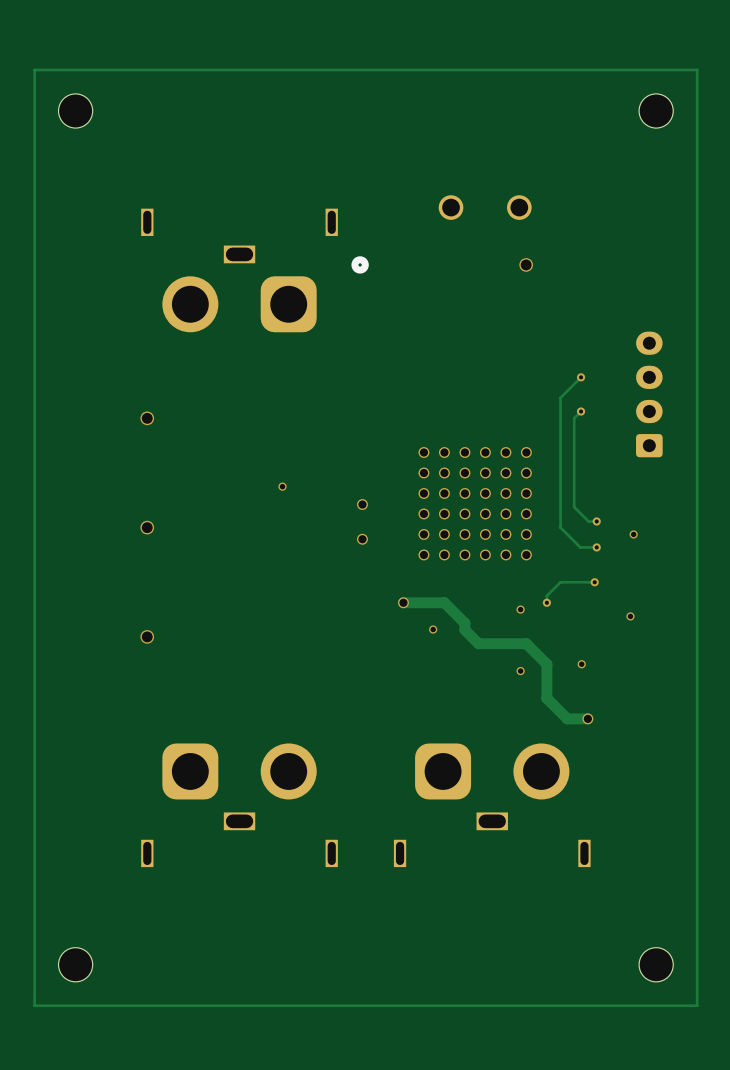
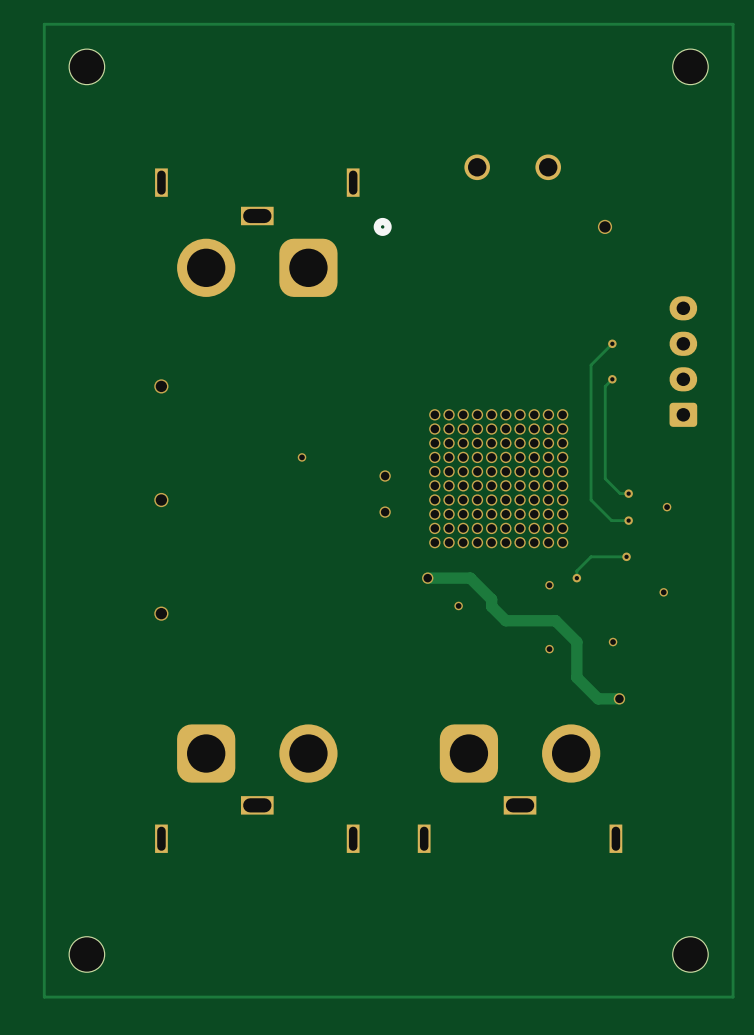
via position: (526, 264) -> (605, 226)
via: none -> (434, 414)
via: none -> (449, 414)
via: none -> (463, 414)
via: none -> (477, 414)
via: none -> (491, 414)
via: none -> (505, 414)
via: none -> (520, 414)
via: none -> (534, 414)
via: none -> (548, 414)
via: none -> (562, 414)
via: (423, 452) -> none
via: (444, 452) -> none
via: (464, 452) -> none
via: (485, 452) -> none
via: (505, 452) -> none
via: (526, 452) -> none
via: none -> (434, 429)
via: none -> (449, 429)
via: none -> (463, 429)
via: none -> (477, 429)
via: none -> (491, 429)
via: none -> (505, 429)
via: none -> (520, 429)
via: none -> (534, 429)
via: none -> (548, 429)
via: none -> (562, 429)
via: none -> (434, 443)
via: none -> (463, 443)
via: (444, 472) -> none
via: none -> (477, 443)
via: none -> (505, 443)
via: (485, 472) -> none
via: none -> (520, 443)
via: none -> (548, 443)
via: (526, 472) -> none
via: none -> (562, 443)
via: none -> (434, 457)
via: none -> (449, 457)
via: none -> (463, 457)
via: none -> (477, 457)
via: none -> (491, 457)
via: none -> (505, 457)
via: none -> (520, 457)
via: none -> (534, 457)
via: none -> (548, 457)
via: none -> (562, 457)
via: (423, 493) -> none
via: (444, 493) -> none
via: (464, 493) -> none
via: (485, 493) -> none
via: (505, 493) -> none
via: (526, 493) -> none
via: none -> (434, 471)
via: none -> (449, 471)
via: none -> (463, 471)
via: none -> (477, 471)
via: none -> (491, 471)
via: none -> (505, 471)
via: none -> (520, 471)
via: none -> (534, 471)
via: none -> (548, 471)
via: none -> (562, 471)
via: none -> (434, 485)
via: none -> (463, 485)
via: (444, 513) -> none
via: none -> (477, 485)
via: none -> (505, 485)
via: (485, 513) -> none
via: none -> (520, 485)
via: none -> (548, 485)
via: (526, 513) -> none
via: none -> (562, 485)
via: none -> (434, 500)
via: none -> (449, 500)
via: none -> (463, 500)
via: none -> (477, 500)
via: none -> (491, 500)
via: none -> (505, 500)
via: none -> (520, 500)
via: none -> (534, 500)
via: none -> (548, 500)
via: none -> (562, 500)
via: (423, 534) -> none
via: (444, 534) -> none
via: (464, 534) -> none
via: (485, 534) -> none
via: (505, 534) -> none
via: (526, 534) -> none
via: none -> (434, 514)
via: none -> (449, 514)
via: none -> (463, 514)
via: none -> (477, 514)
via: none -> (491, 514)
via: none -> (505, 514)
via: none -> (520, 514)
via: none -> (534, 514)
via: none -> (548, 514)
via: none -> (562, 514)
via: none -> (434, 528)
via: none -> (463, 528)
via: (444, 554) -> none
via: none -> (477, 528)
via: none -> (505, 528)
via: (485, 554) -> none
via: none -> (520, 528)
via: none -> (548, 528)
via: (526, 554) -> none
via: none -> (562, 528)
via: none -> (434, 542)
via: none -> (449, 542)
via: none -> (463, 542)
via: none -> (477, 542)
via: none -> (491, 542)
via: none -> (505, 542)
via: none -> (520, 542)
via: none -> (534, 542)
via: none -> (548, 542)
via: none -> (562, 542)

